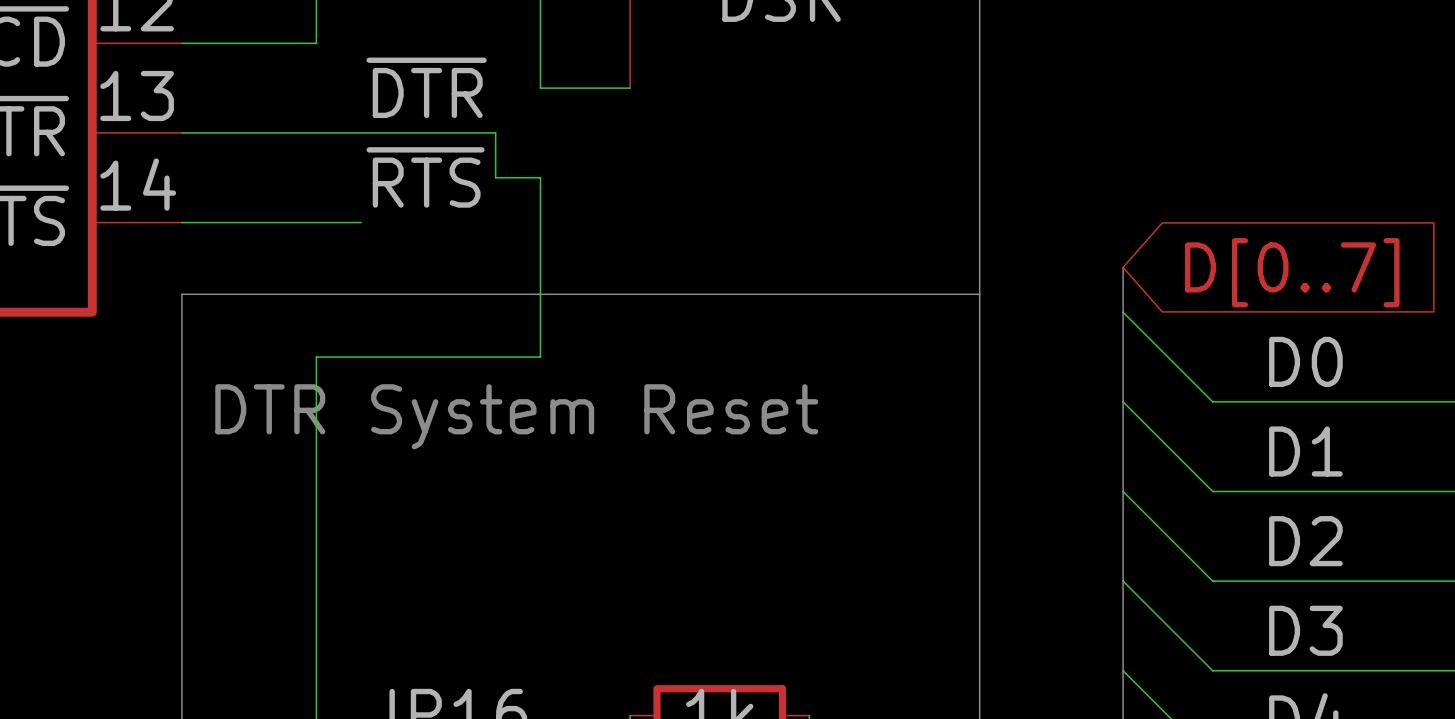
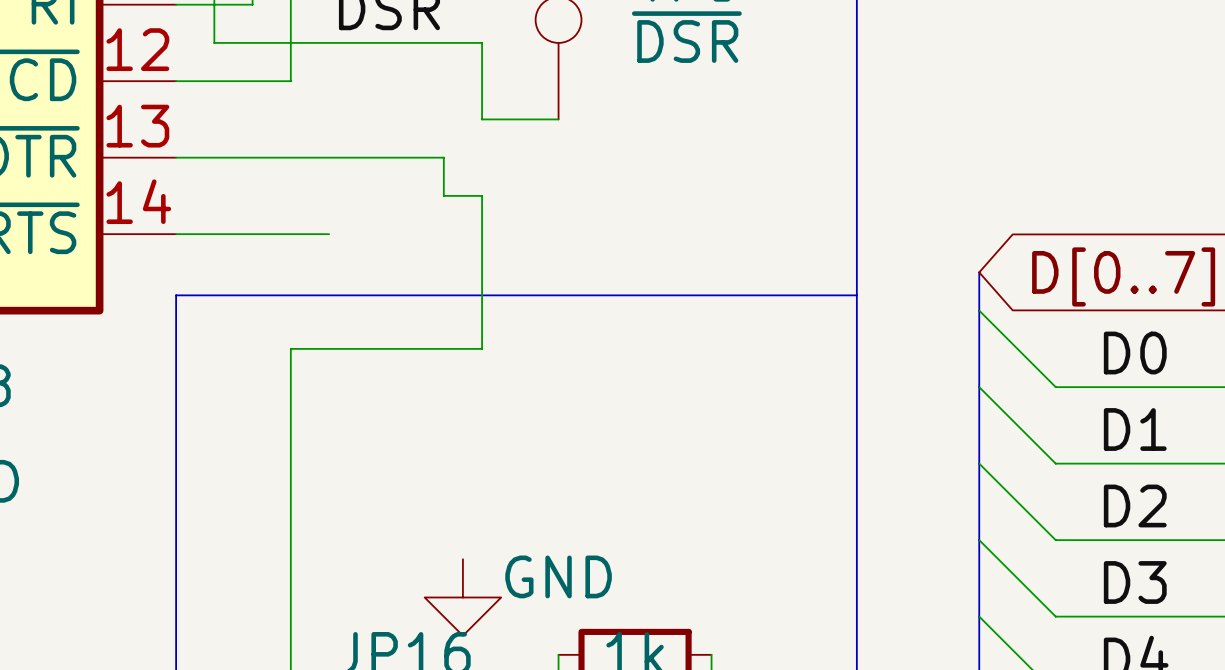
label: ~{DTR} (426, 87) -> none
label: ~{RTS} (425, 177) -> none
text: DTR System Reset (516, 416) -> none
power symbol: none -> GND (462, 597)

